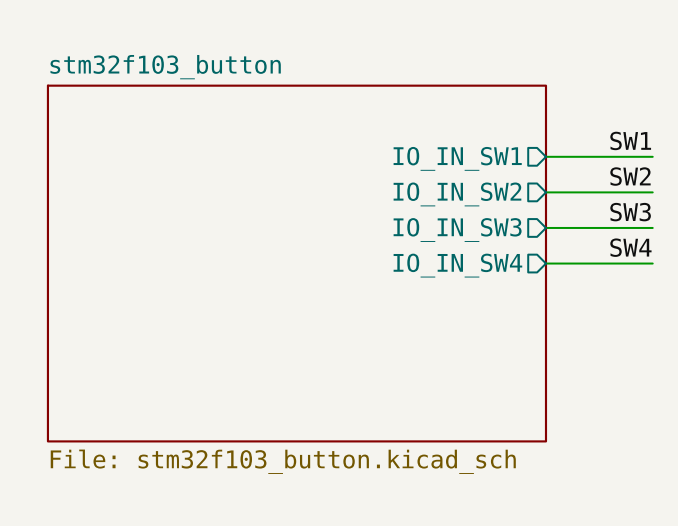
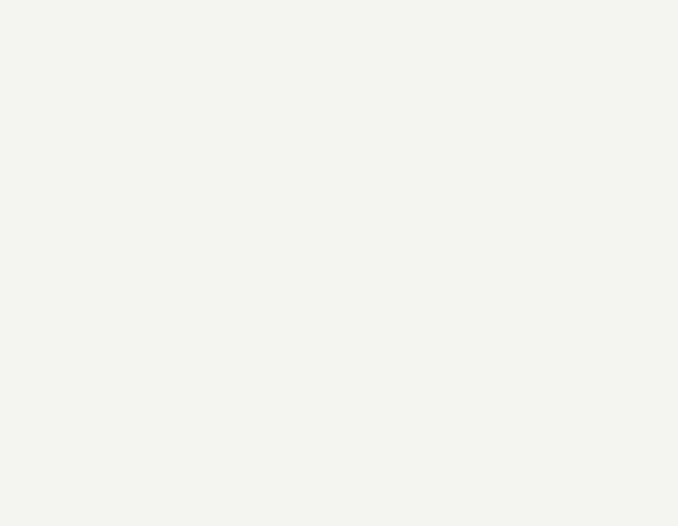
label: SW1 (630, 140) -> none
wire: (545, 156) (652, 156) -> none
sheet pin: IO_IN_SW1 (457, 158) -> none
label: SW2 (630, 176) -> none
wire: (545, 192) (652, 192) -> none
sheet pin: IO_IN_SW2 (457, 194) -> none
label: SW3 (630, 212) -> none
wire: (545, 227) (652, 227) -> none
sheet pin: IO_IN_SW3 (457, 230) -> none
label: SW4 (630, 247) -> none
sheet stm32f103_button: File: stm32f103_button.kicad_sch (296, 263) -> none
wire: (545, 263) (652, 263) -> none
sheet pin: IO_IN_SW4 (457, 265) -> none

